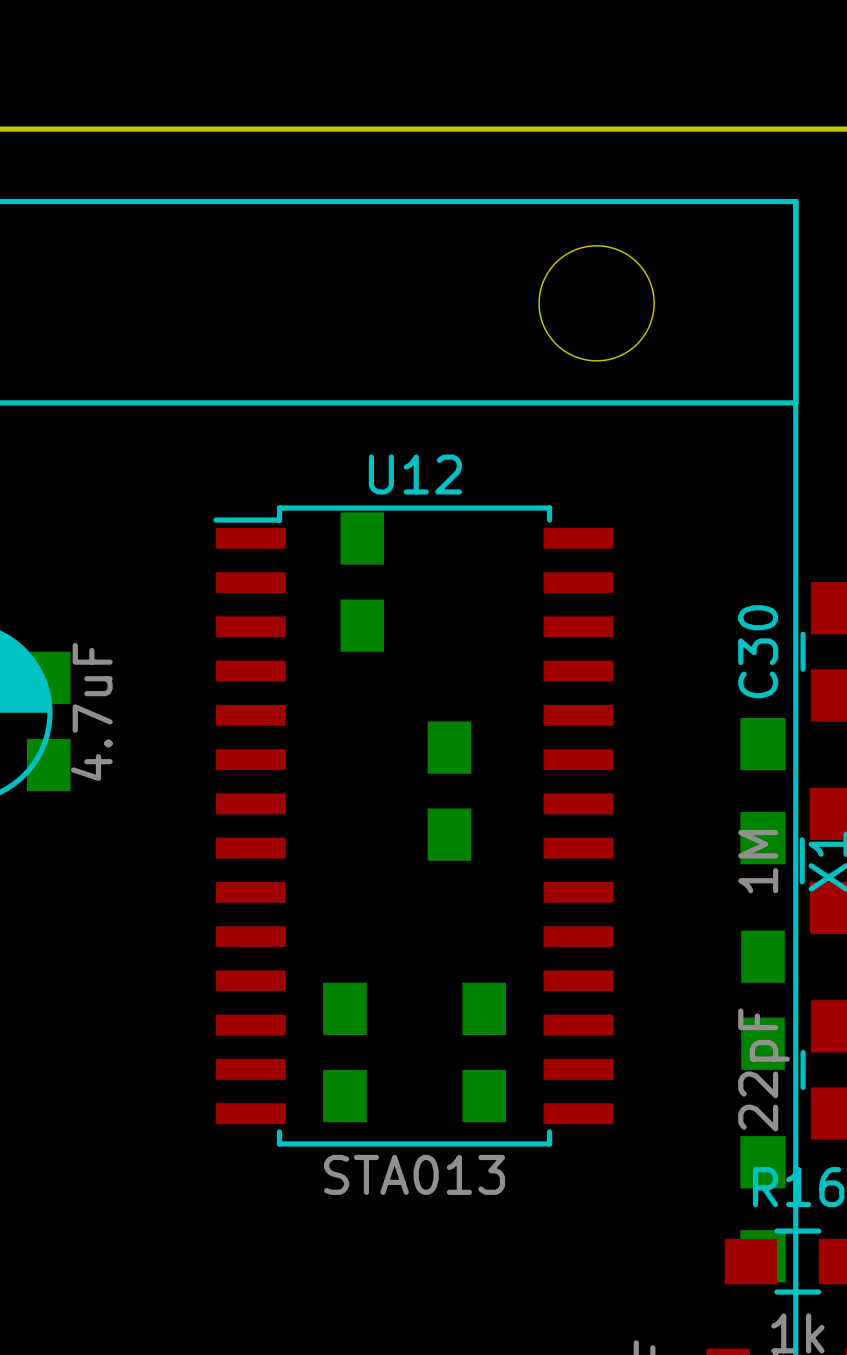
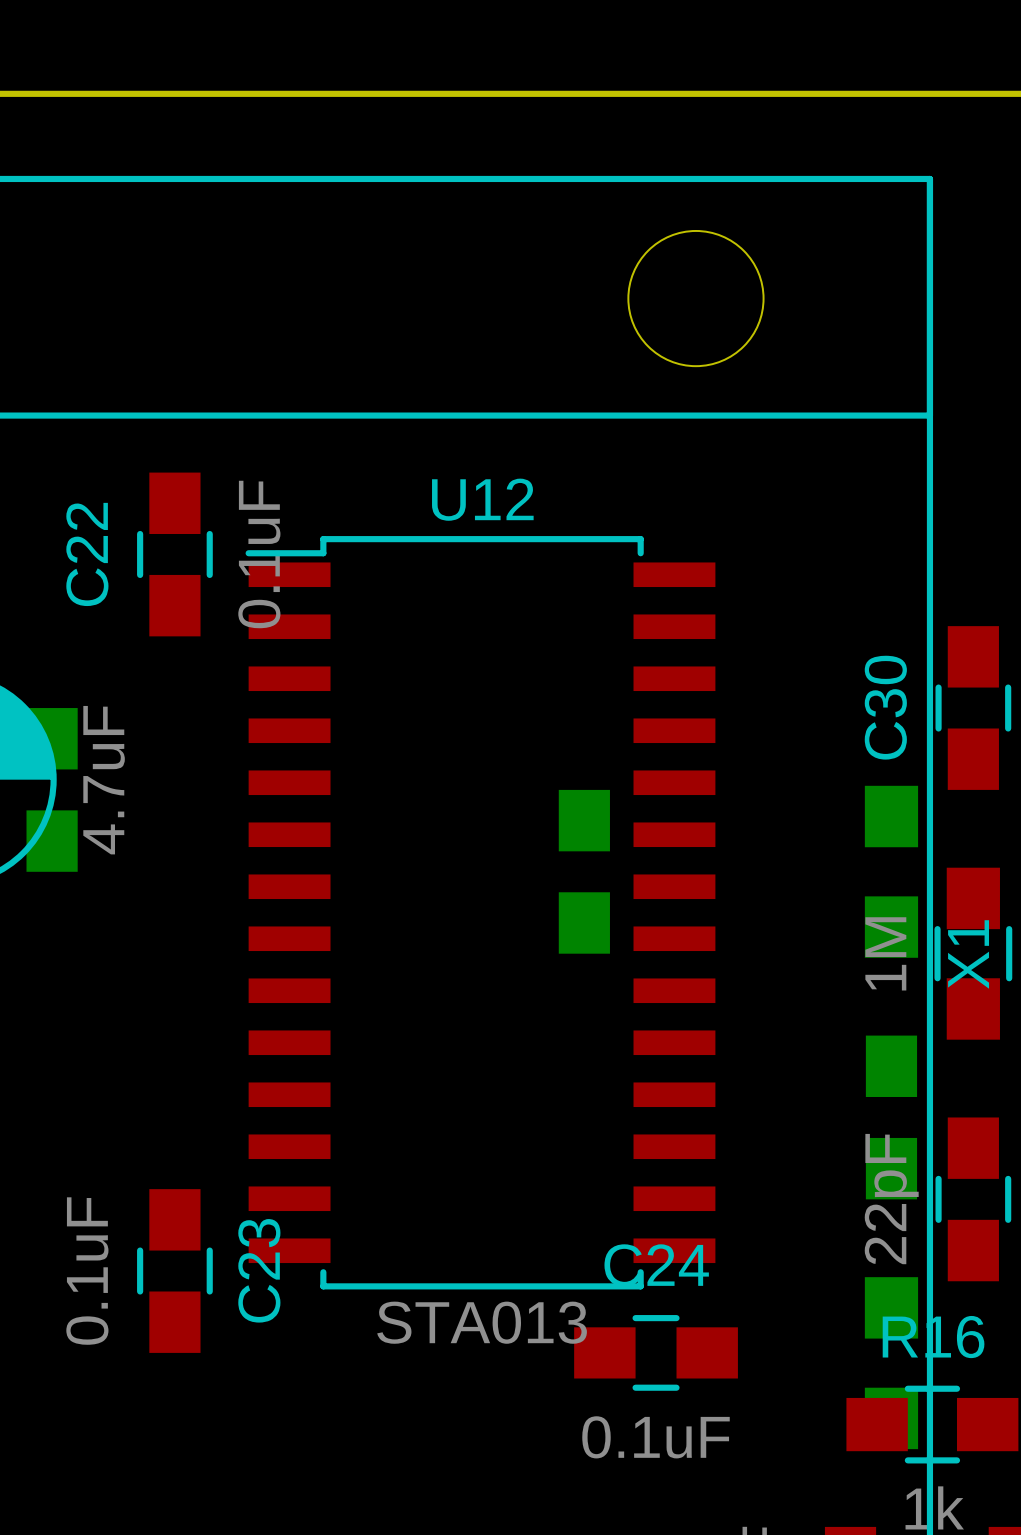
C22 side: bottom (362, 582) -> top (174, 554)
part position: (449, 791) -> (584, 871)
C23 side: bottom (344, 1052) -> top (174, 1271)
C24 side: bottom (484, 1052) -> top (656, 1352)

